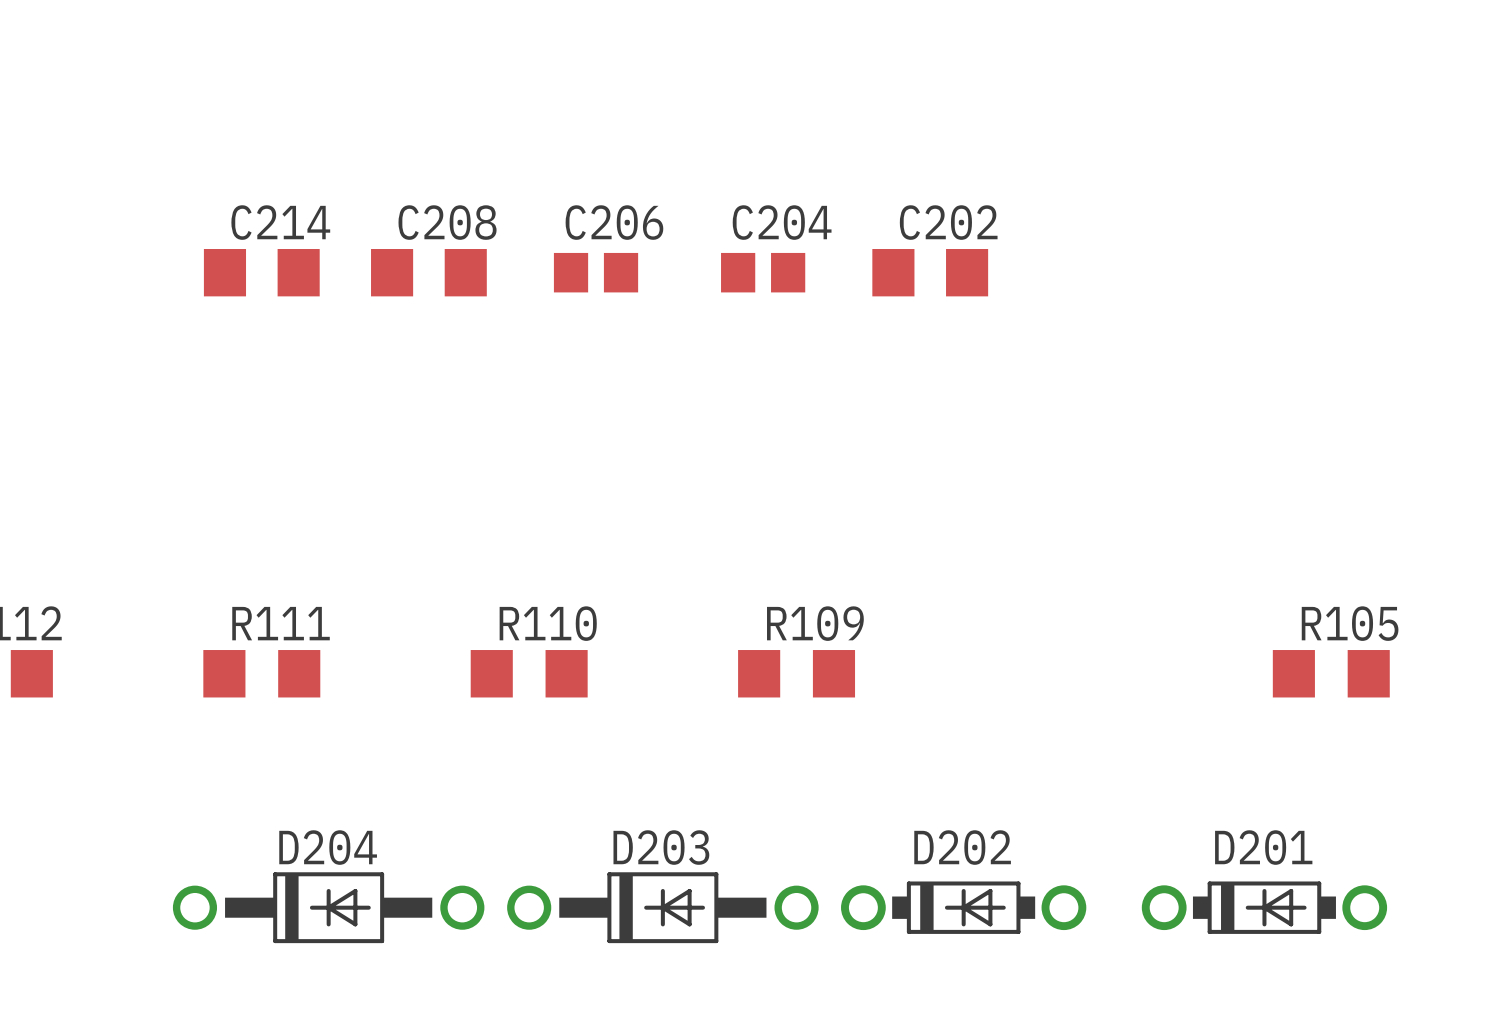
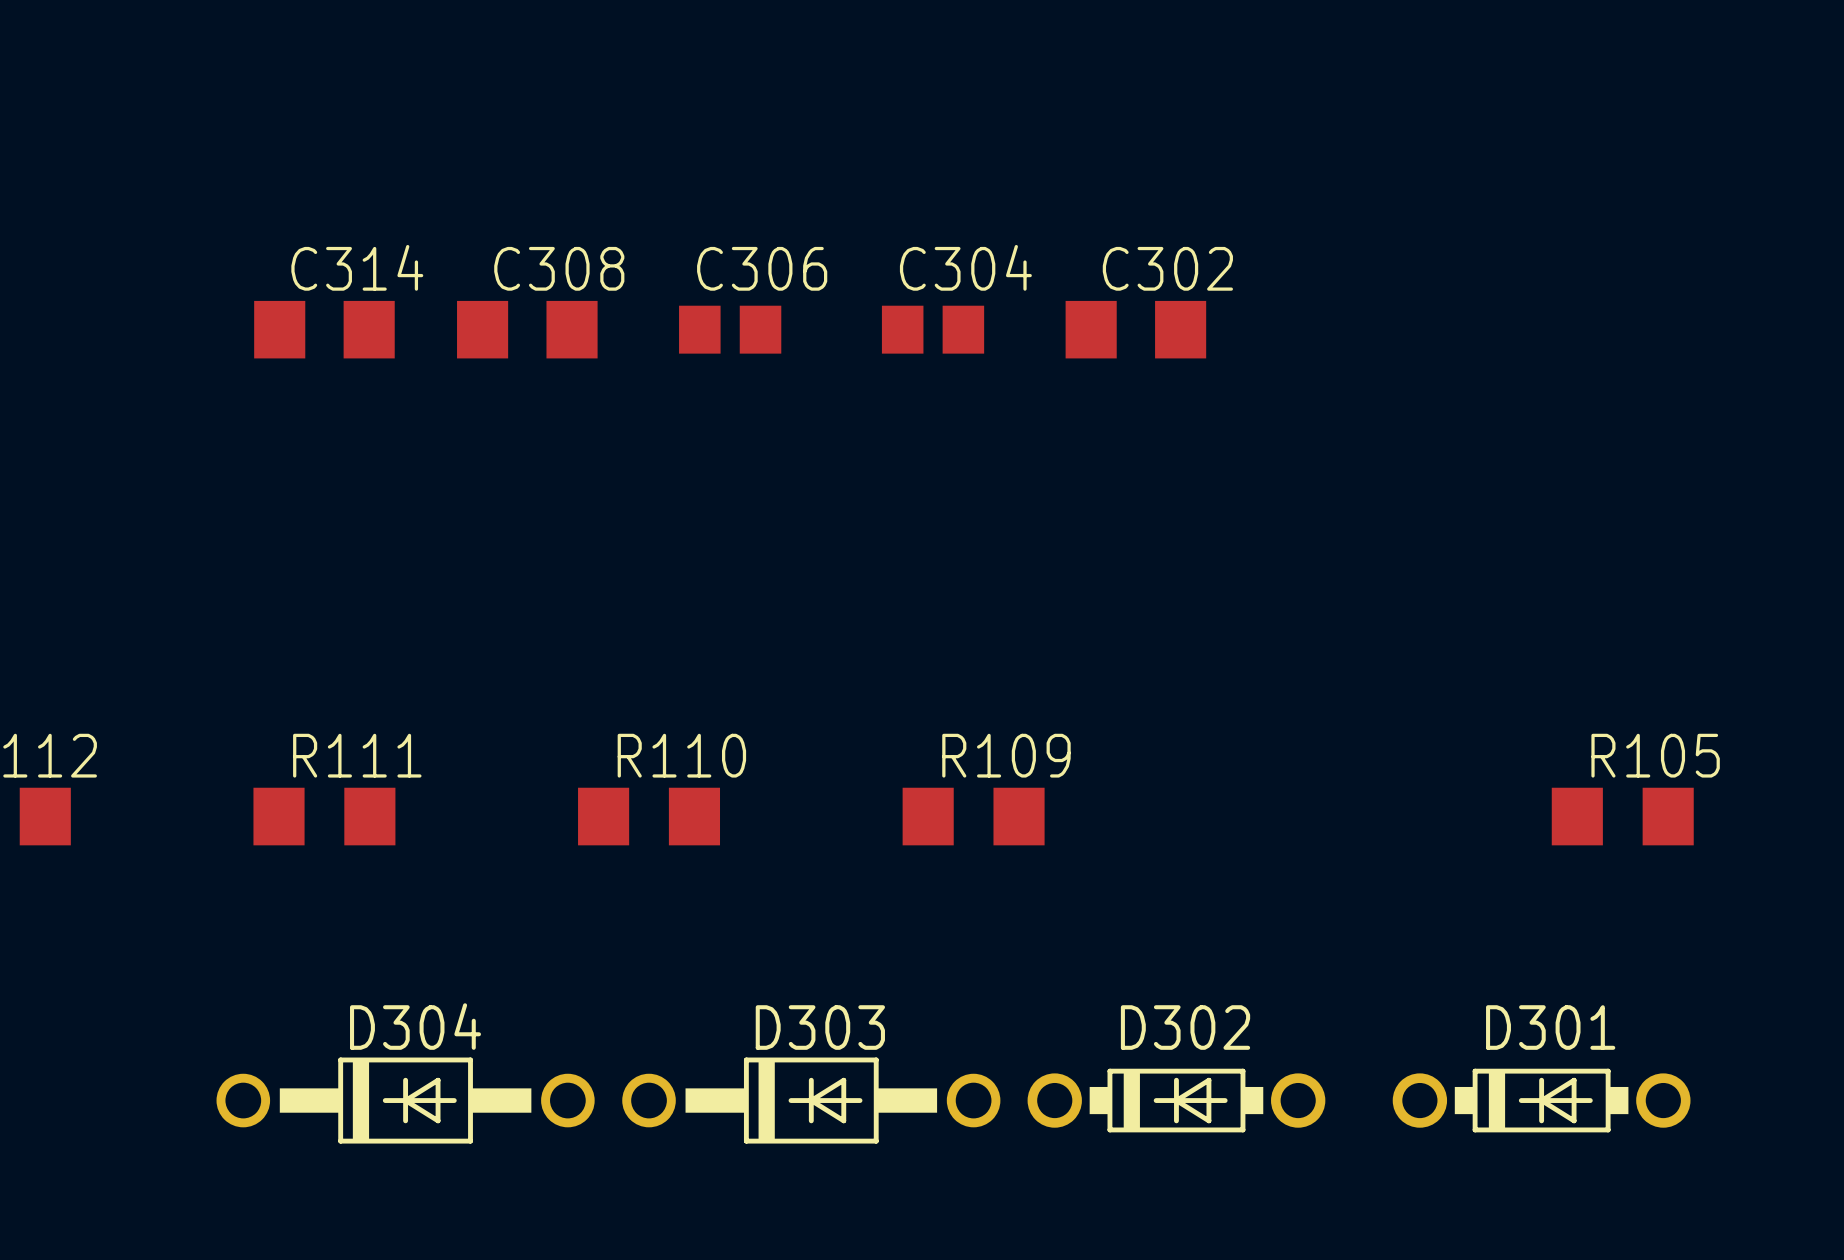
C214 name: C214 (280, 222) -> C314 (357, 267)
C208 name: C208 (447, 222) -> C308 (559, 268)
C206 name: C206 (614, 222) -> C306 (762, 268)
C204 name: C204 (782, 222) -> C304 (965, 267)
C202 name: C202 (948, 222) -> C302 (1167, 268)
D204 name: D204 (328, 847) -> D304 (415, 1026)
D203 name: D203 (661, 847) -> D303 (820, 1027)
D202 name: D202 (962, 847) -> D302 (1185, 1027)
D201 name: D201 (1263, 847) -> D301 (1550, 1027)

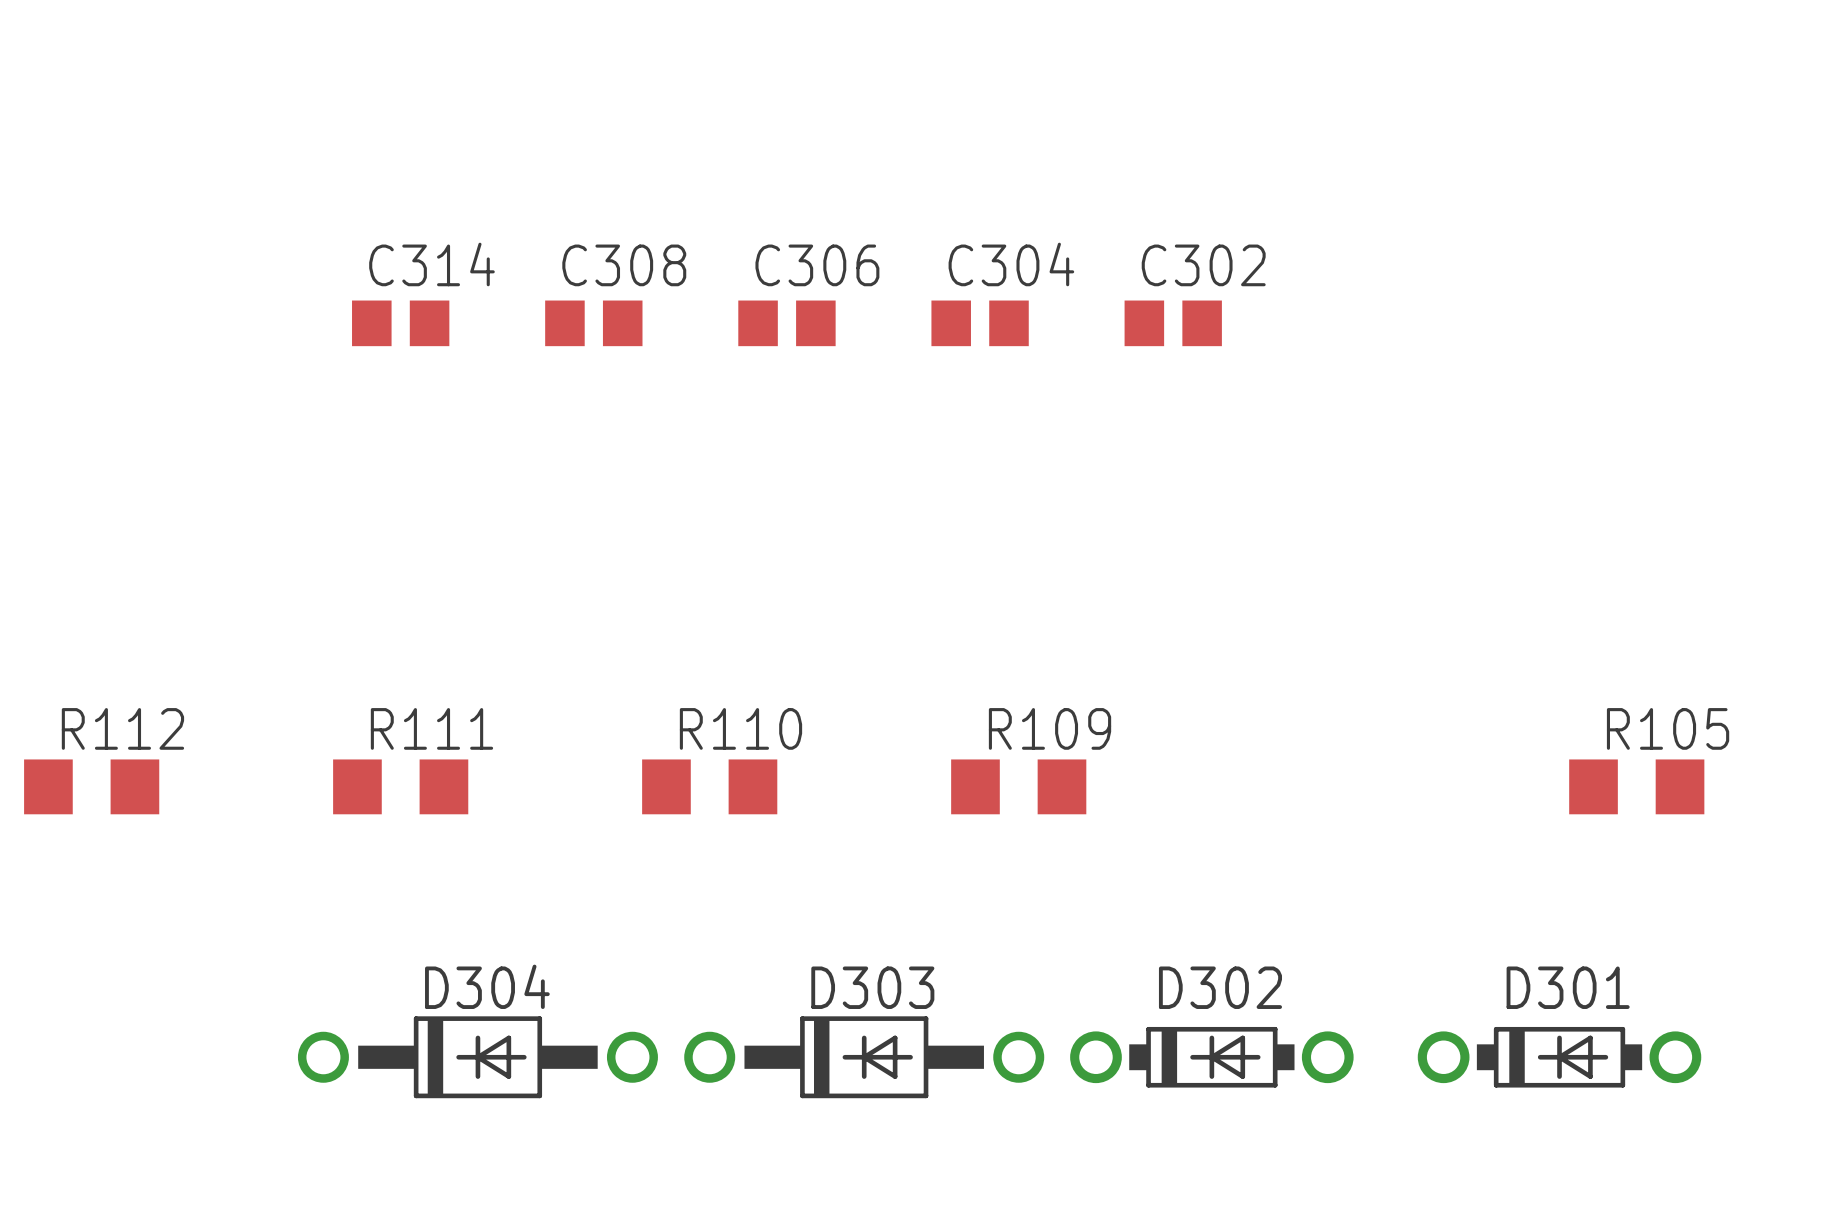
C314 footprint: [254, 300, 395, 359] -> [352, 300, 450, 347]
C308 footprint: [457, 300, 598, 359] -> [545, 300, 643, 347]
C302 footprint: [1065, 300, 1207, 359] -> [1124, 300, 1222, 347]

